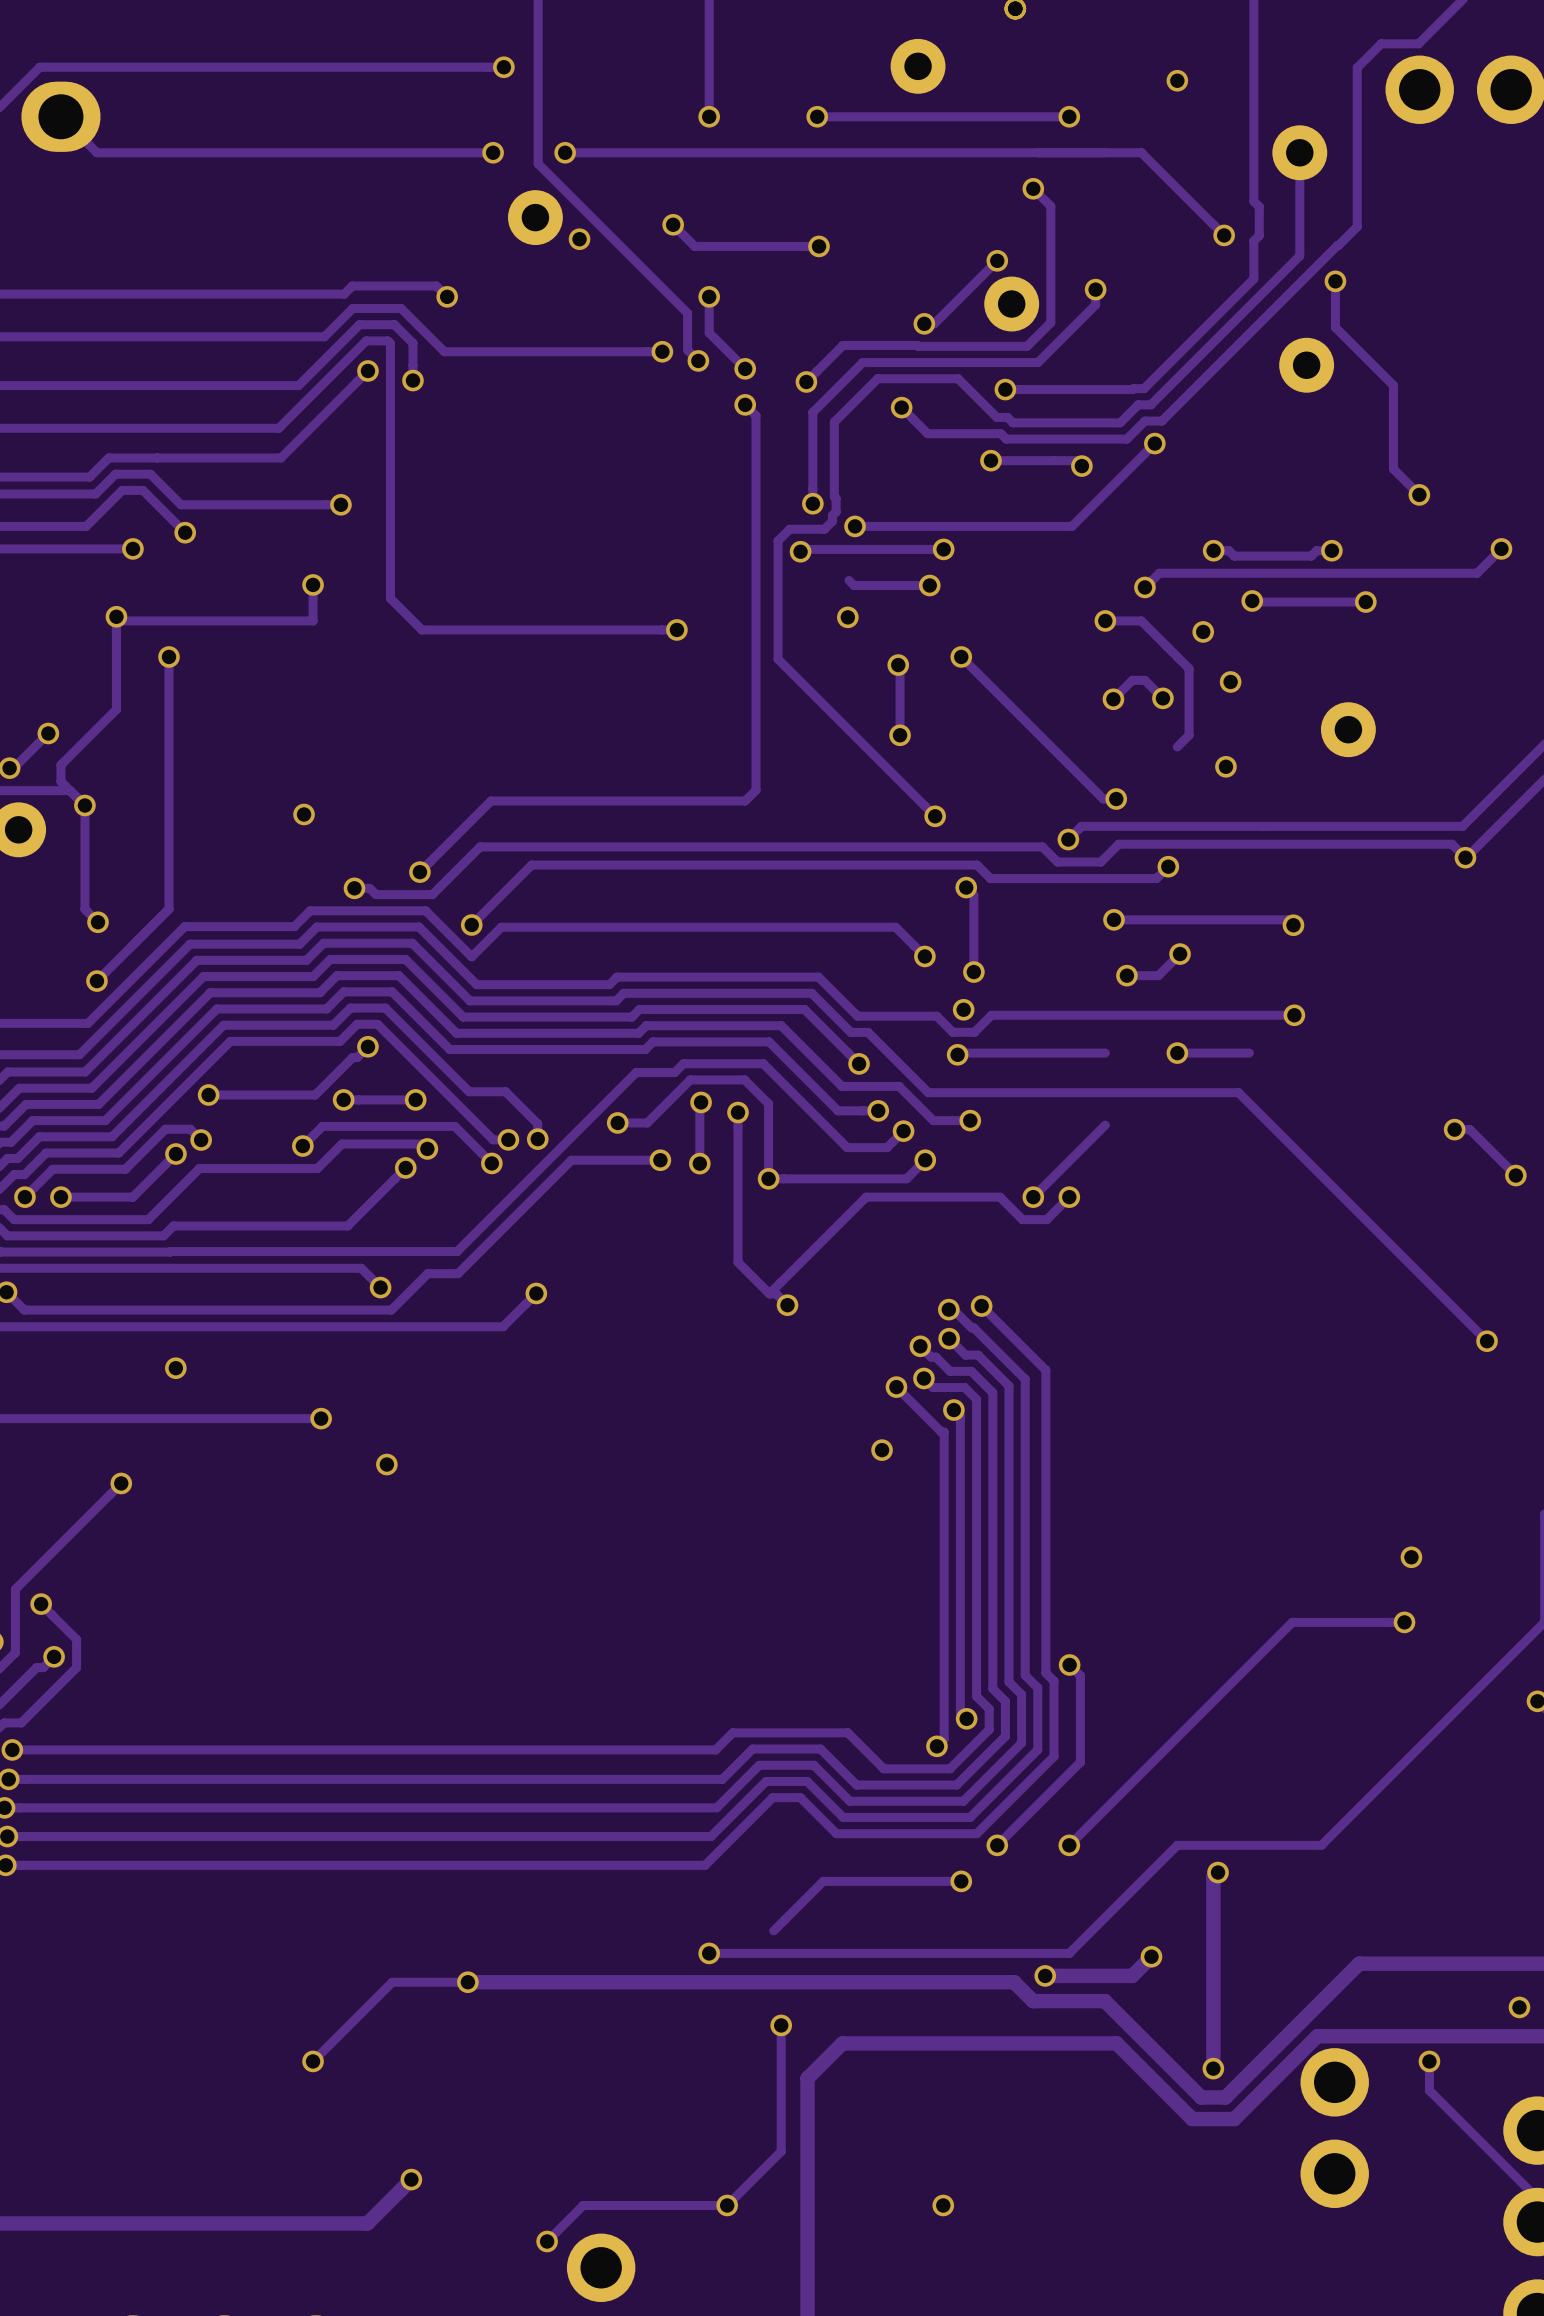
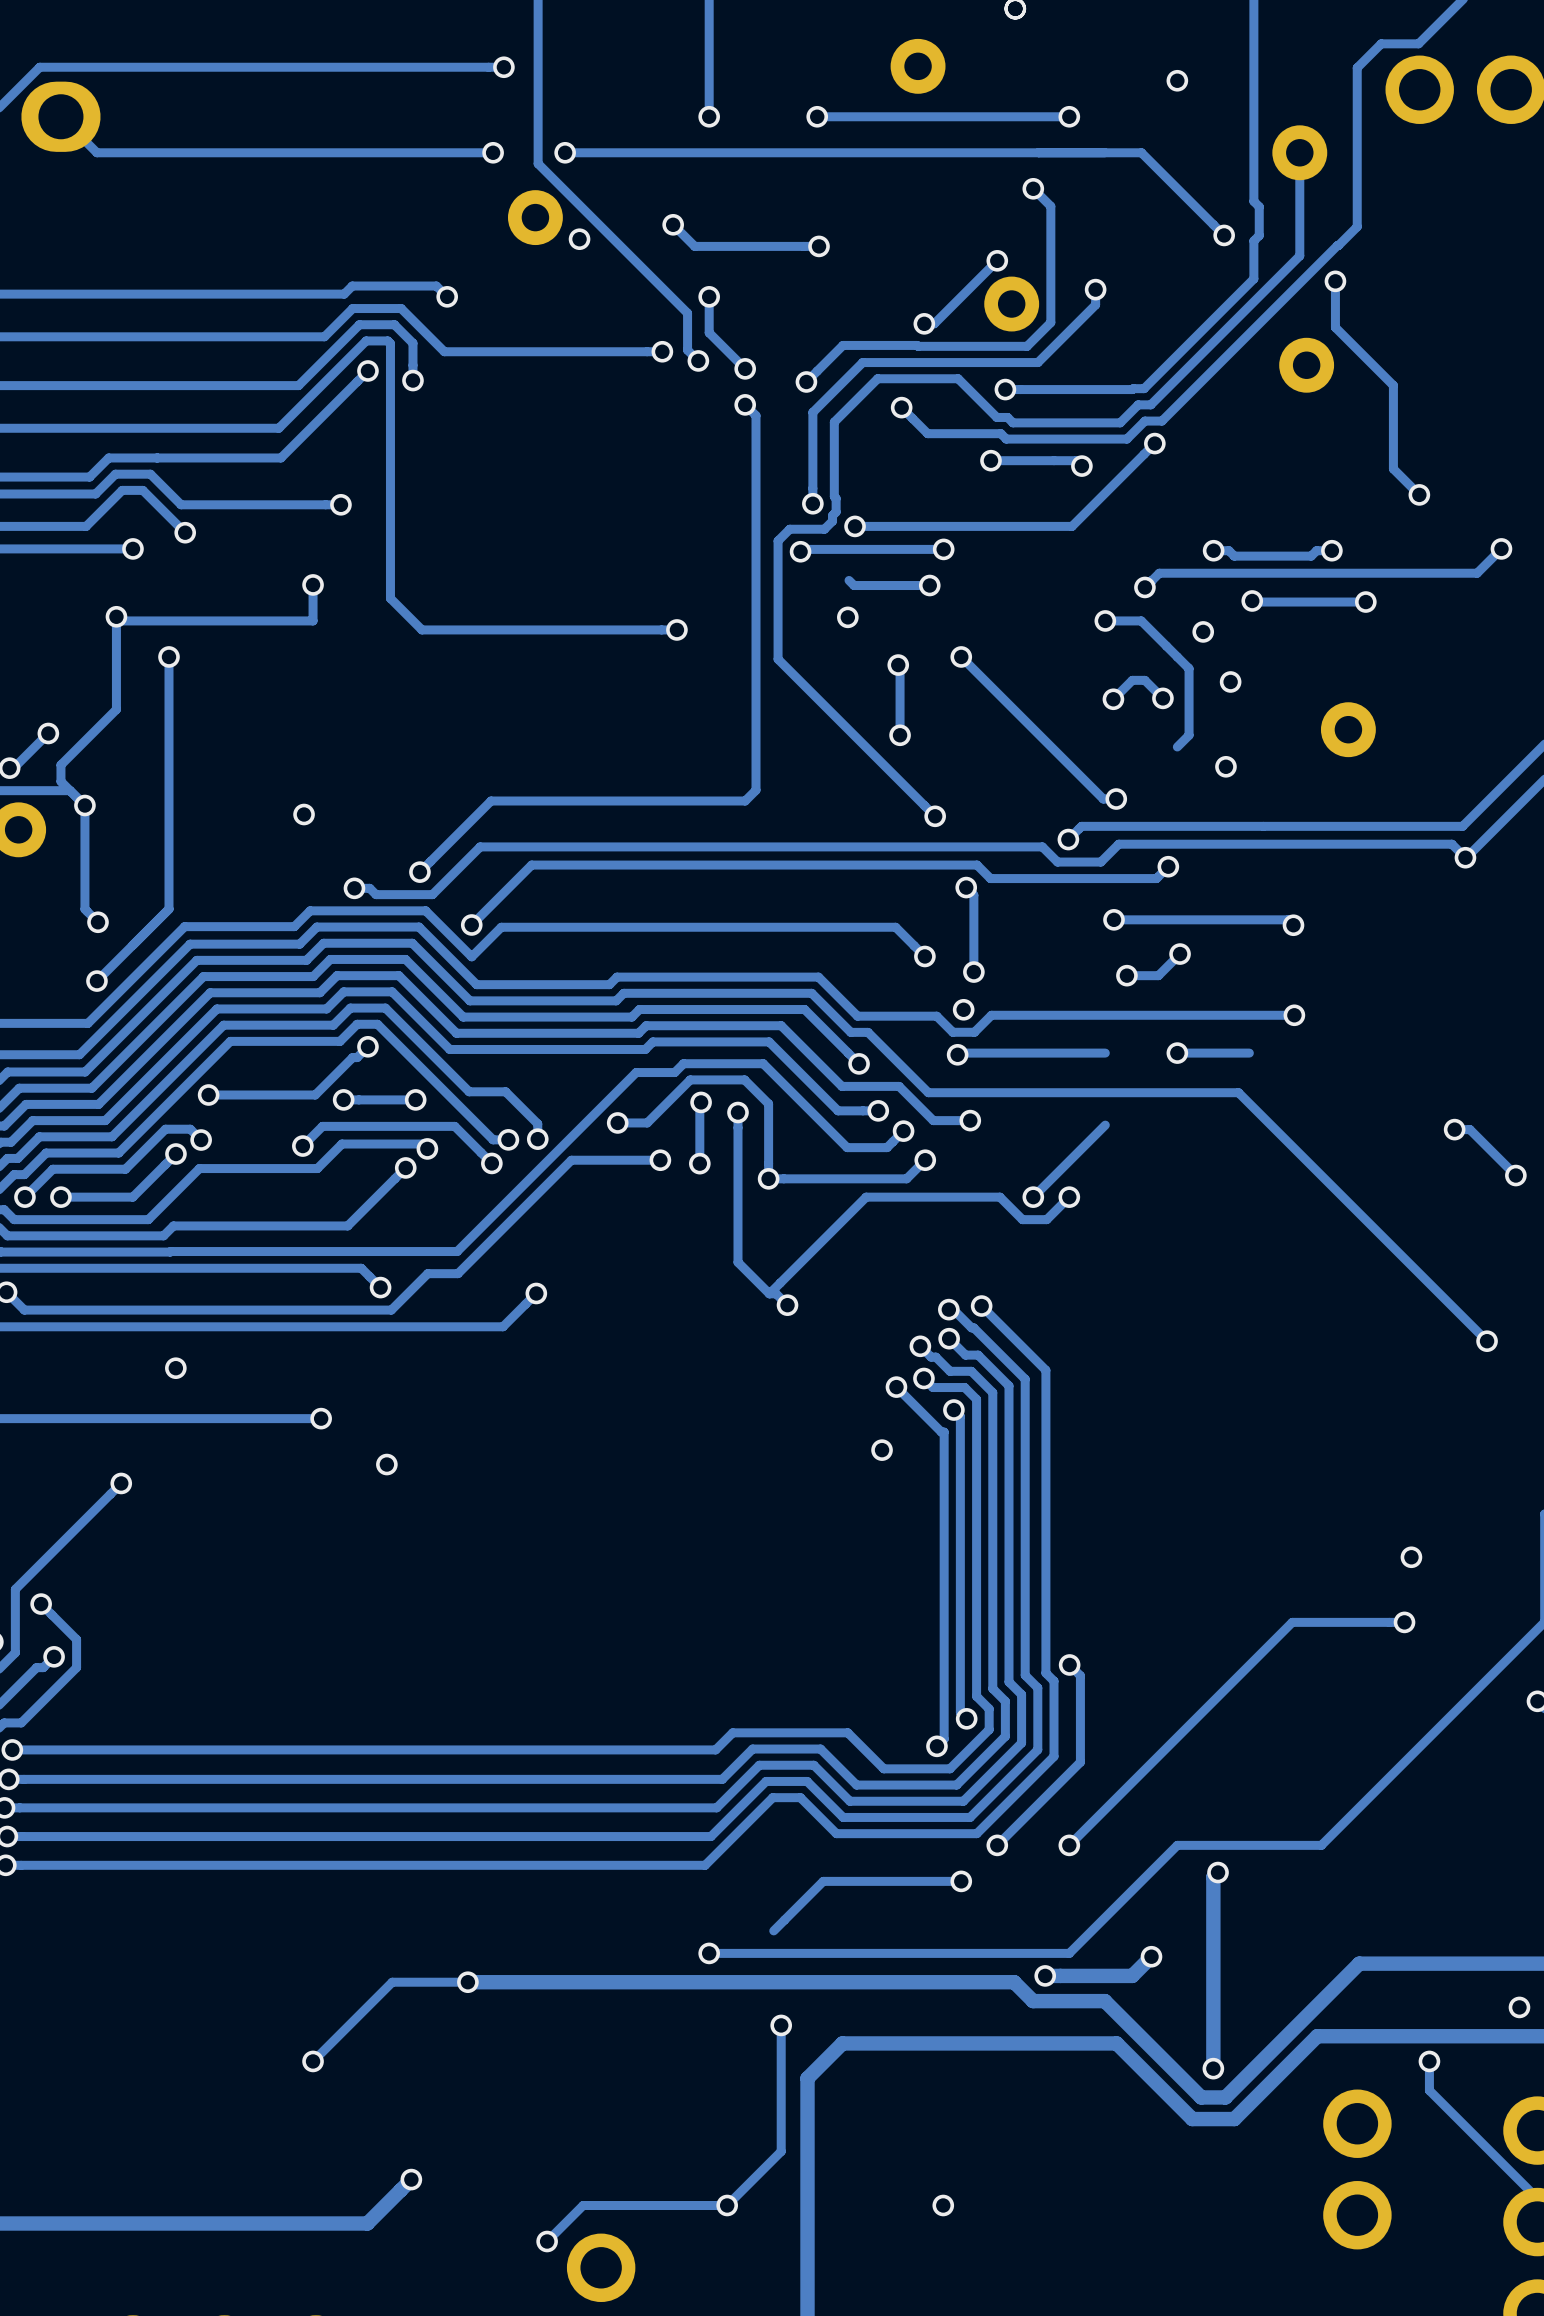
part position: (1334, 2128) -> (1357, 2169)

